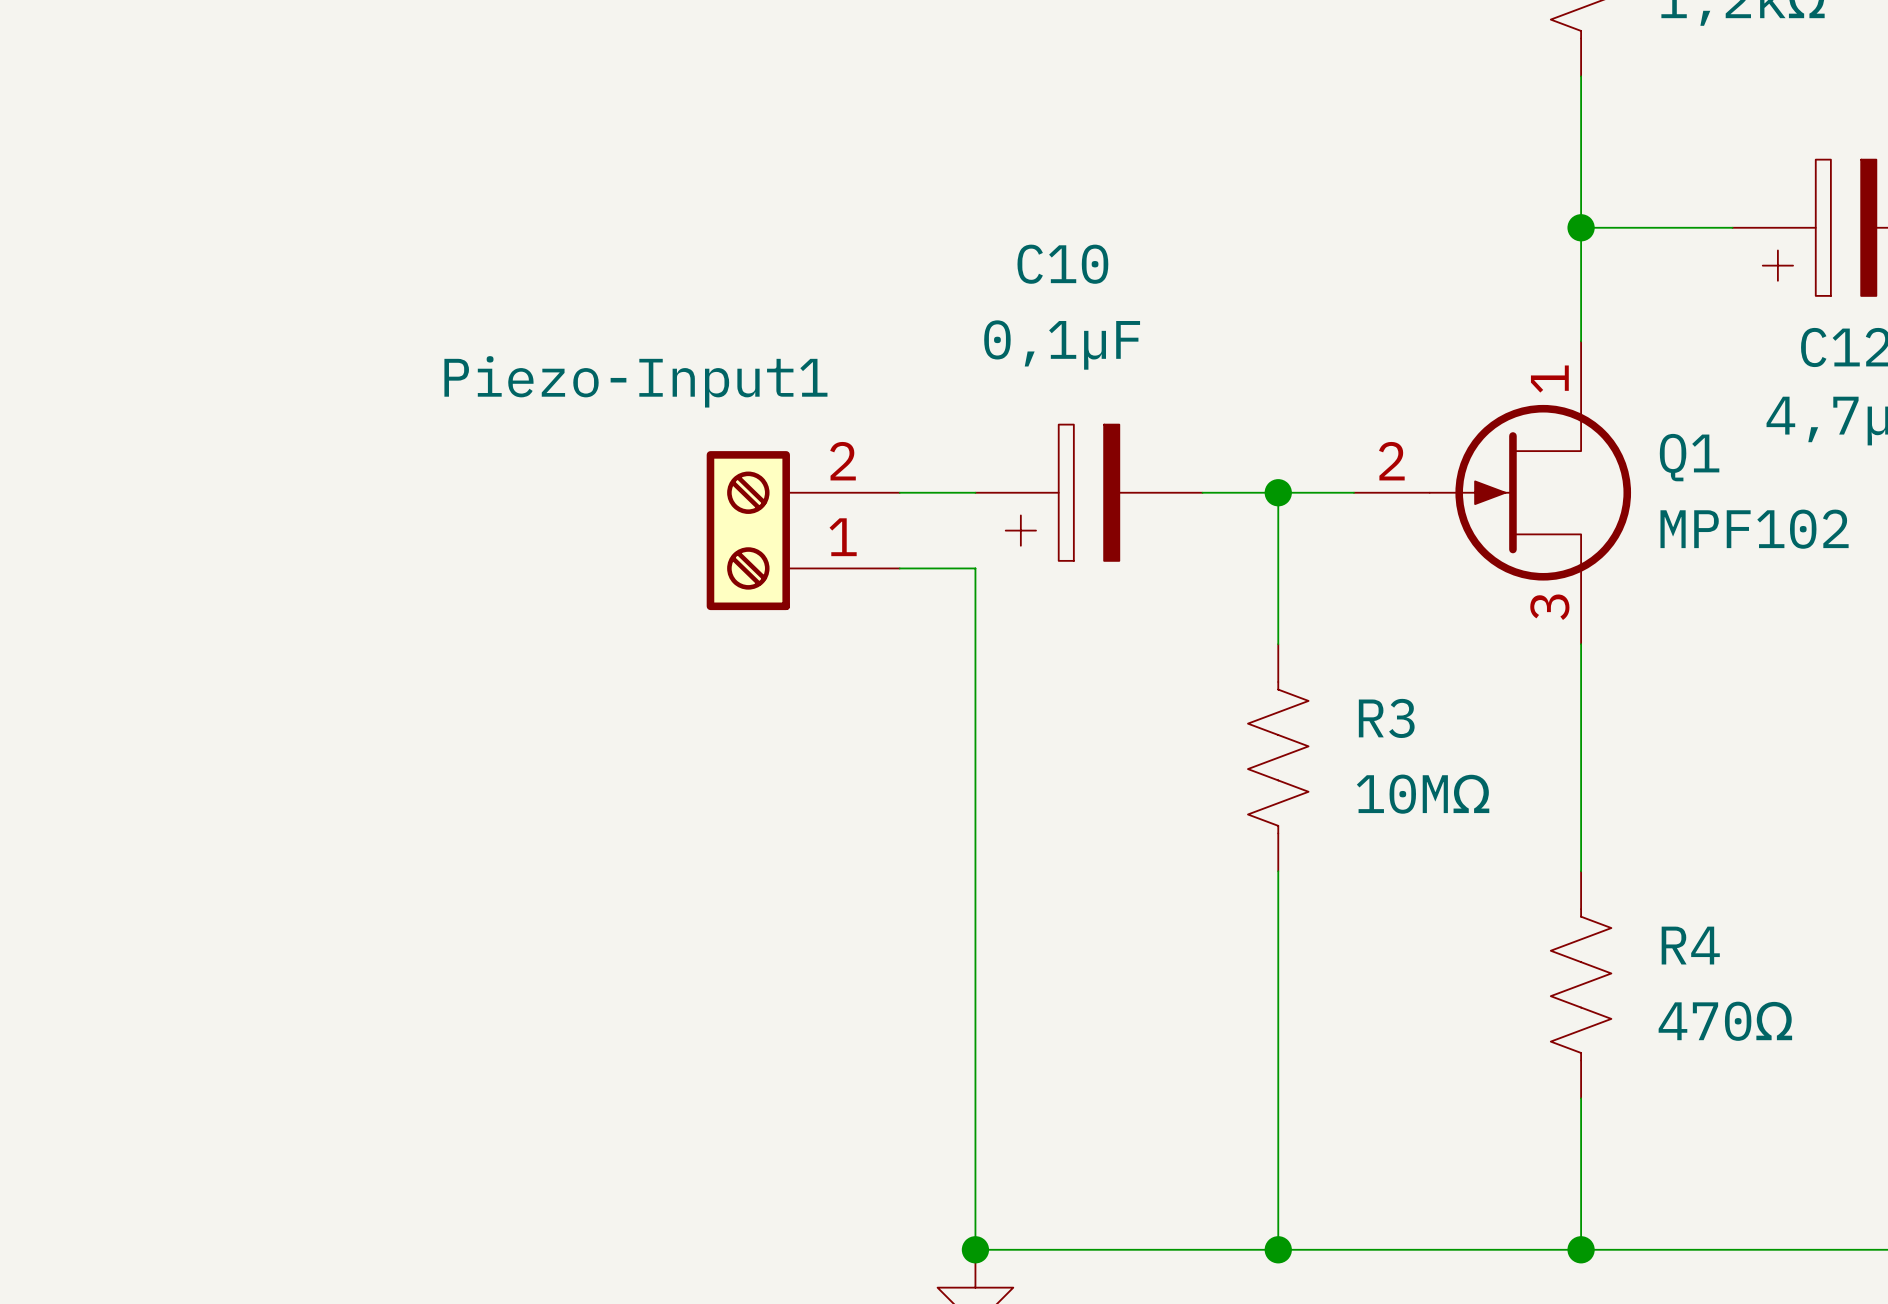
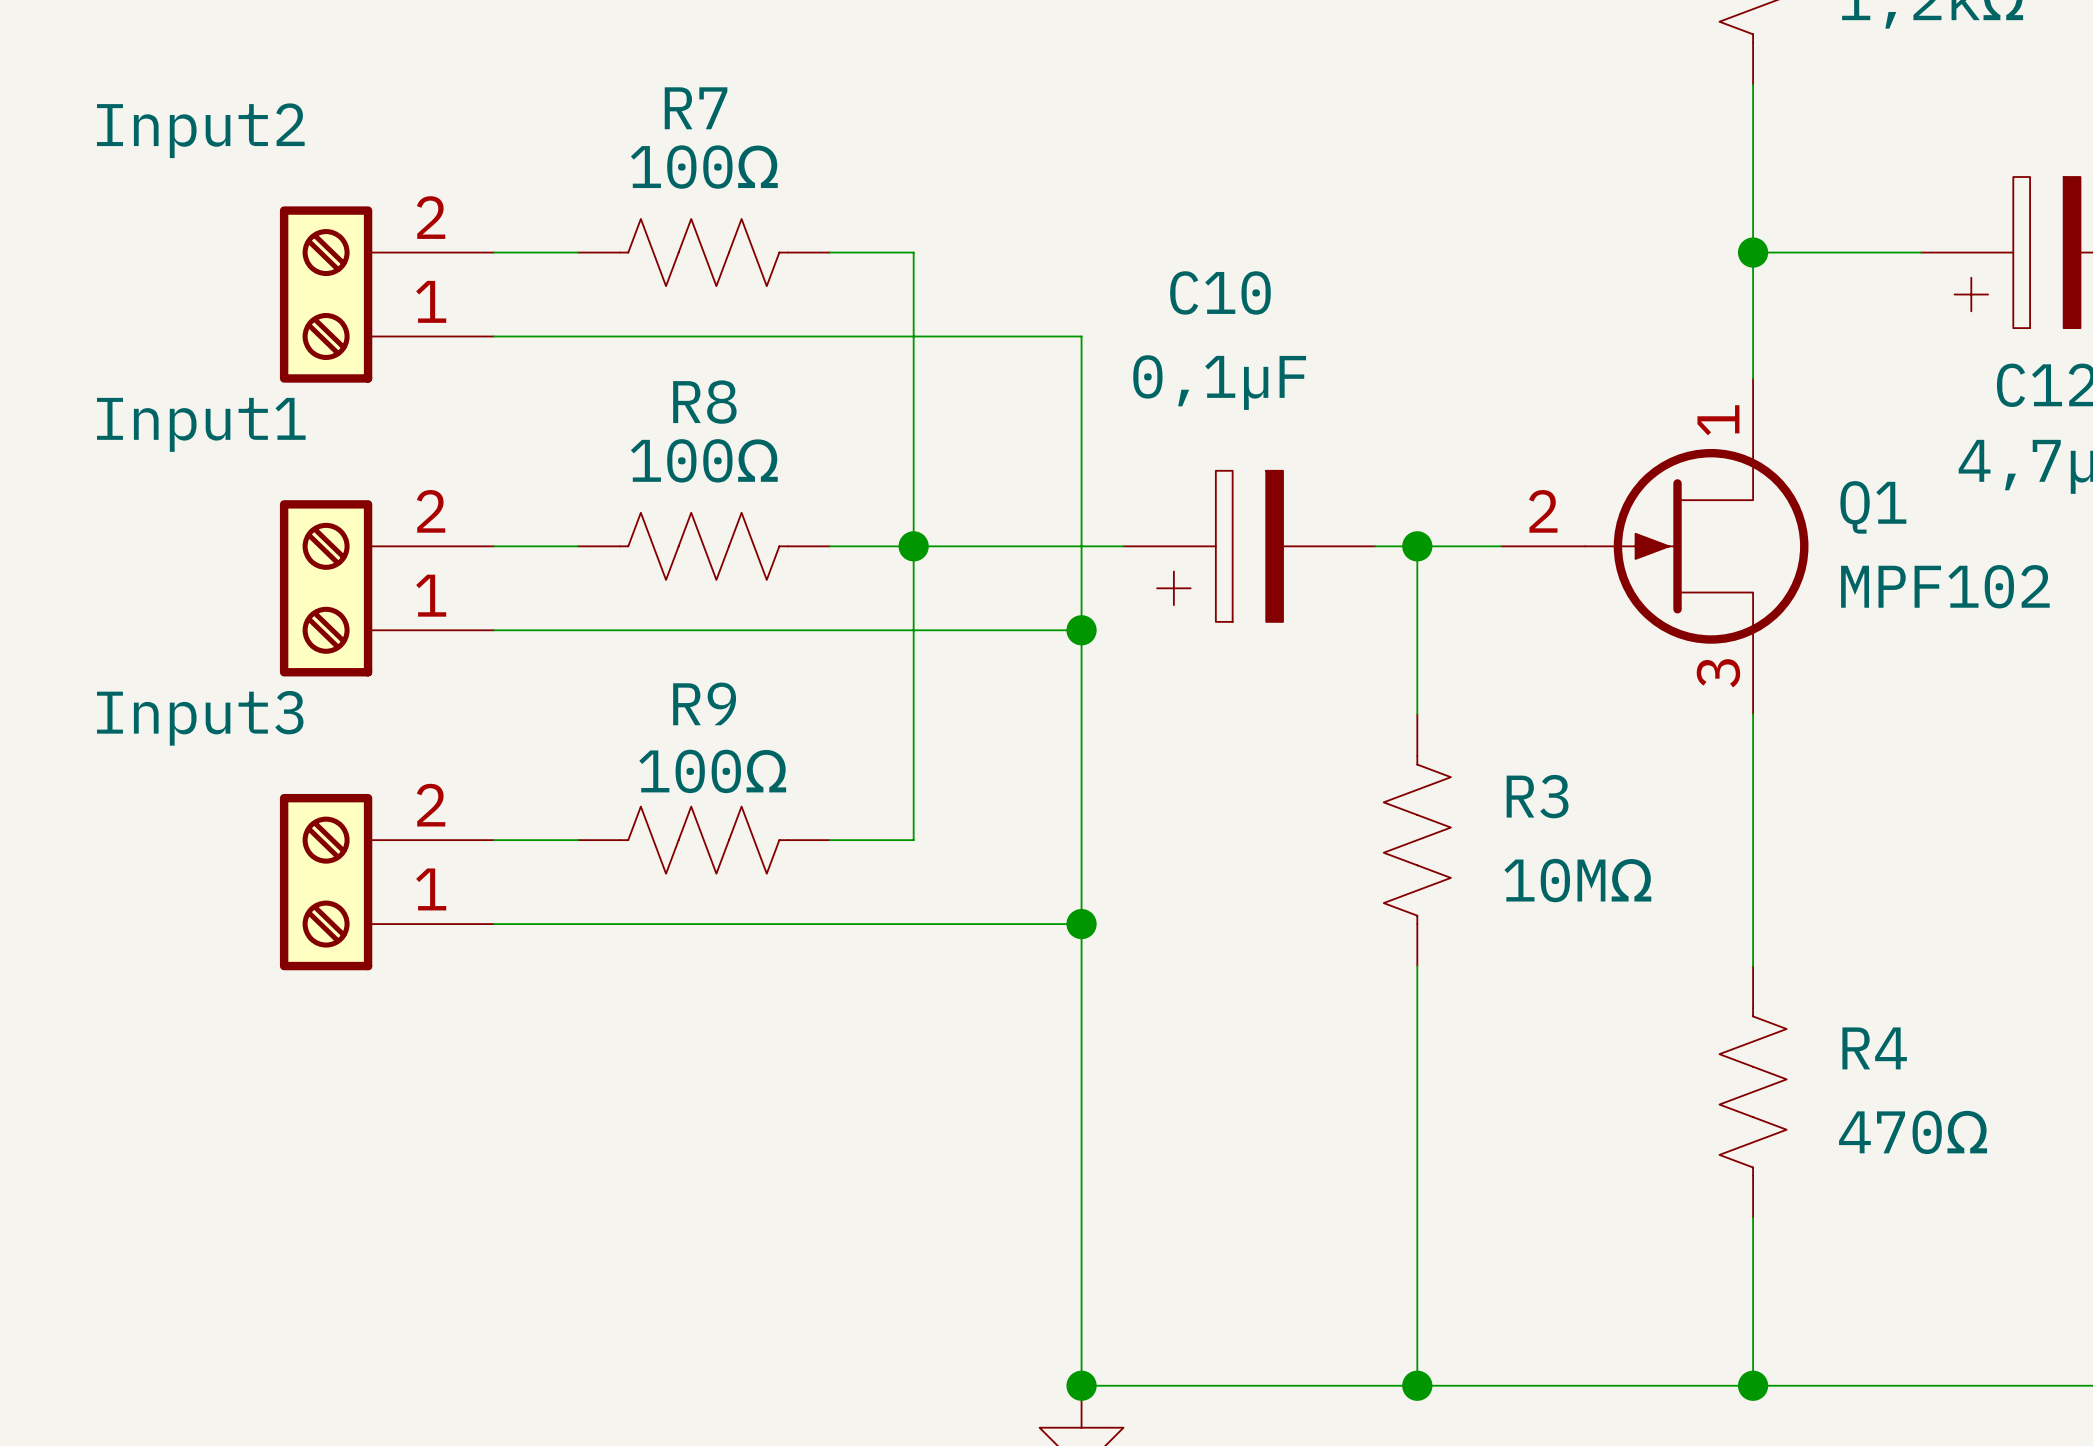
wire: none -> (493, 252) (577, 252)
R7: none -> 100Ω (703, 252)
wire: none -> (829, 252) (913, 252) (913, 840) (829, 840)
Input2: none -> (386, 294)
wire: none -> (493, 336) (1081, 336) (1081, 630)
wire: none -> (493, 546) (577, 546)
R8: none -> 100Ω (703, 546)
junction: none -> (913, 546)
C10 position: (1089, 492) -> (1249, 546)
Input1: none -> (386, 588)
Piezo-Input1: (803, 530) -> none
wire: none -> (493, 630) (997, 630)
junction: none -> (1081, 630)
wire: none -> (493, 840) (577, 840)
R9: none -> 100Ω (703, 840)
Input3: none -> (386, 882)
wire: none -> (493, 924) (1081, 924)
junction: none -> (1081, 924)

